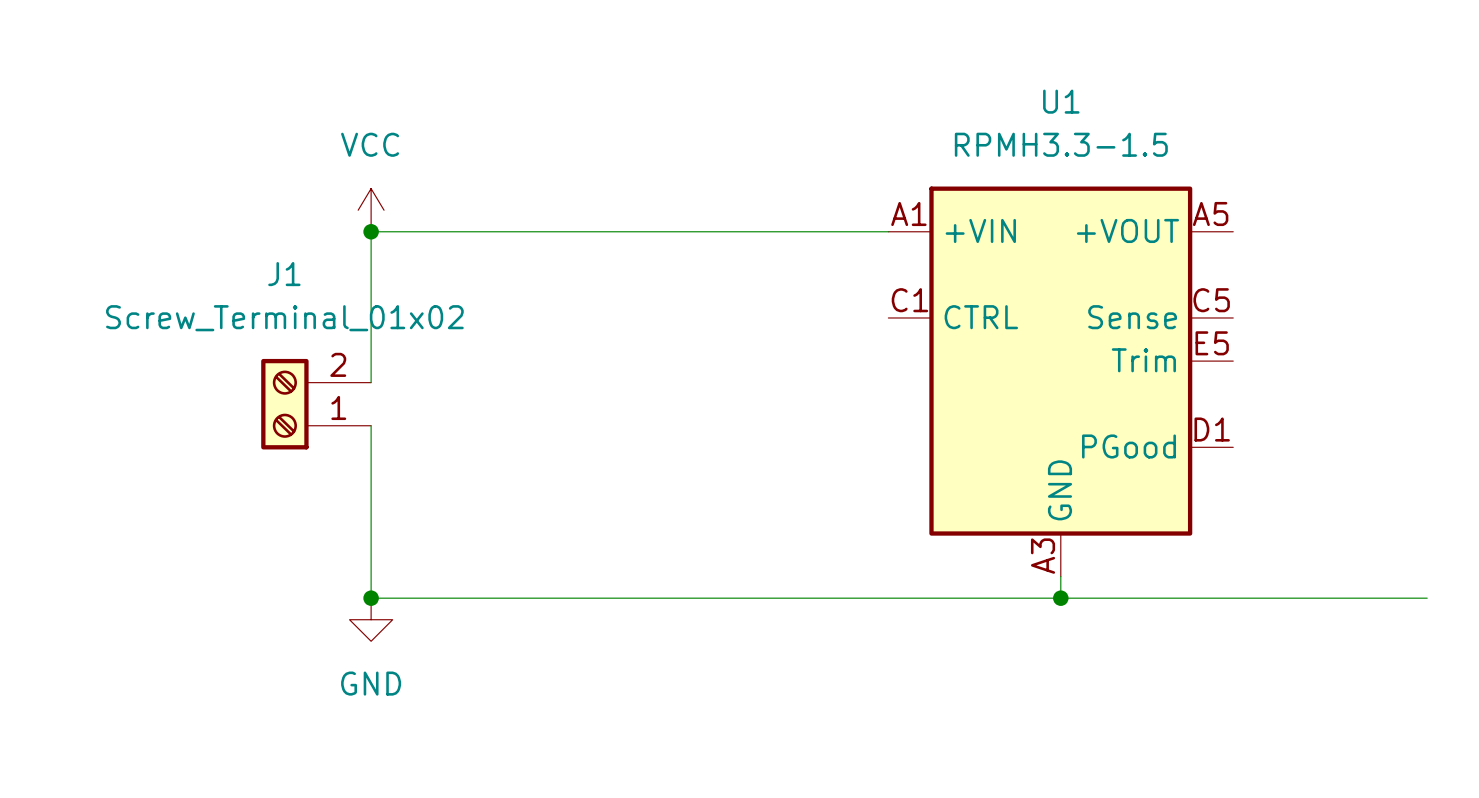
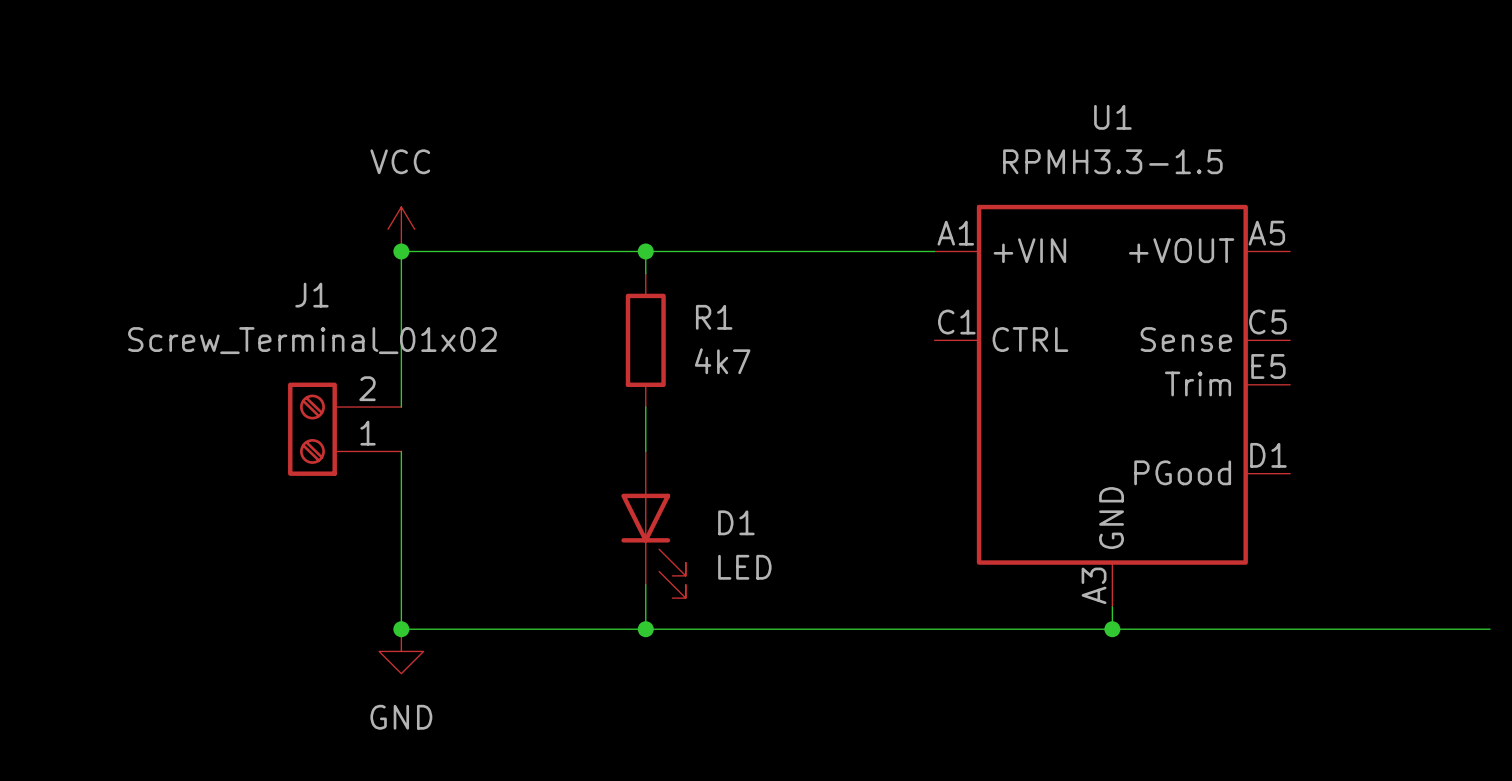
wire: none -> (645, 251) (645, 273)
junction: none -> (645, 251)
R1: none -> 4k7 (645, 340)
wire: none -> (645, 407) (645, 451)
D1: none -> LED (653, 524)
wire: none -> (645, 584) (645, 629)
junction: none -> (645, 629)

